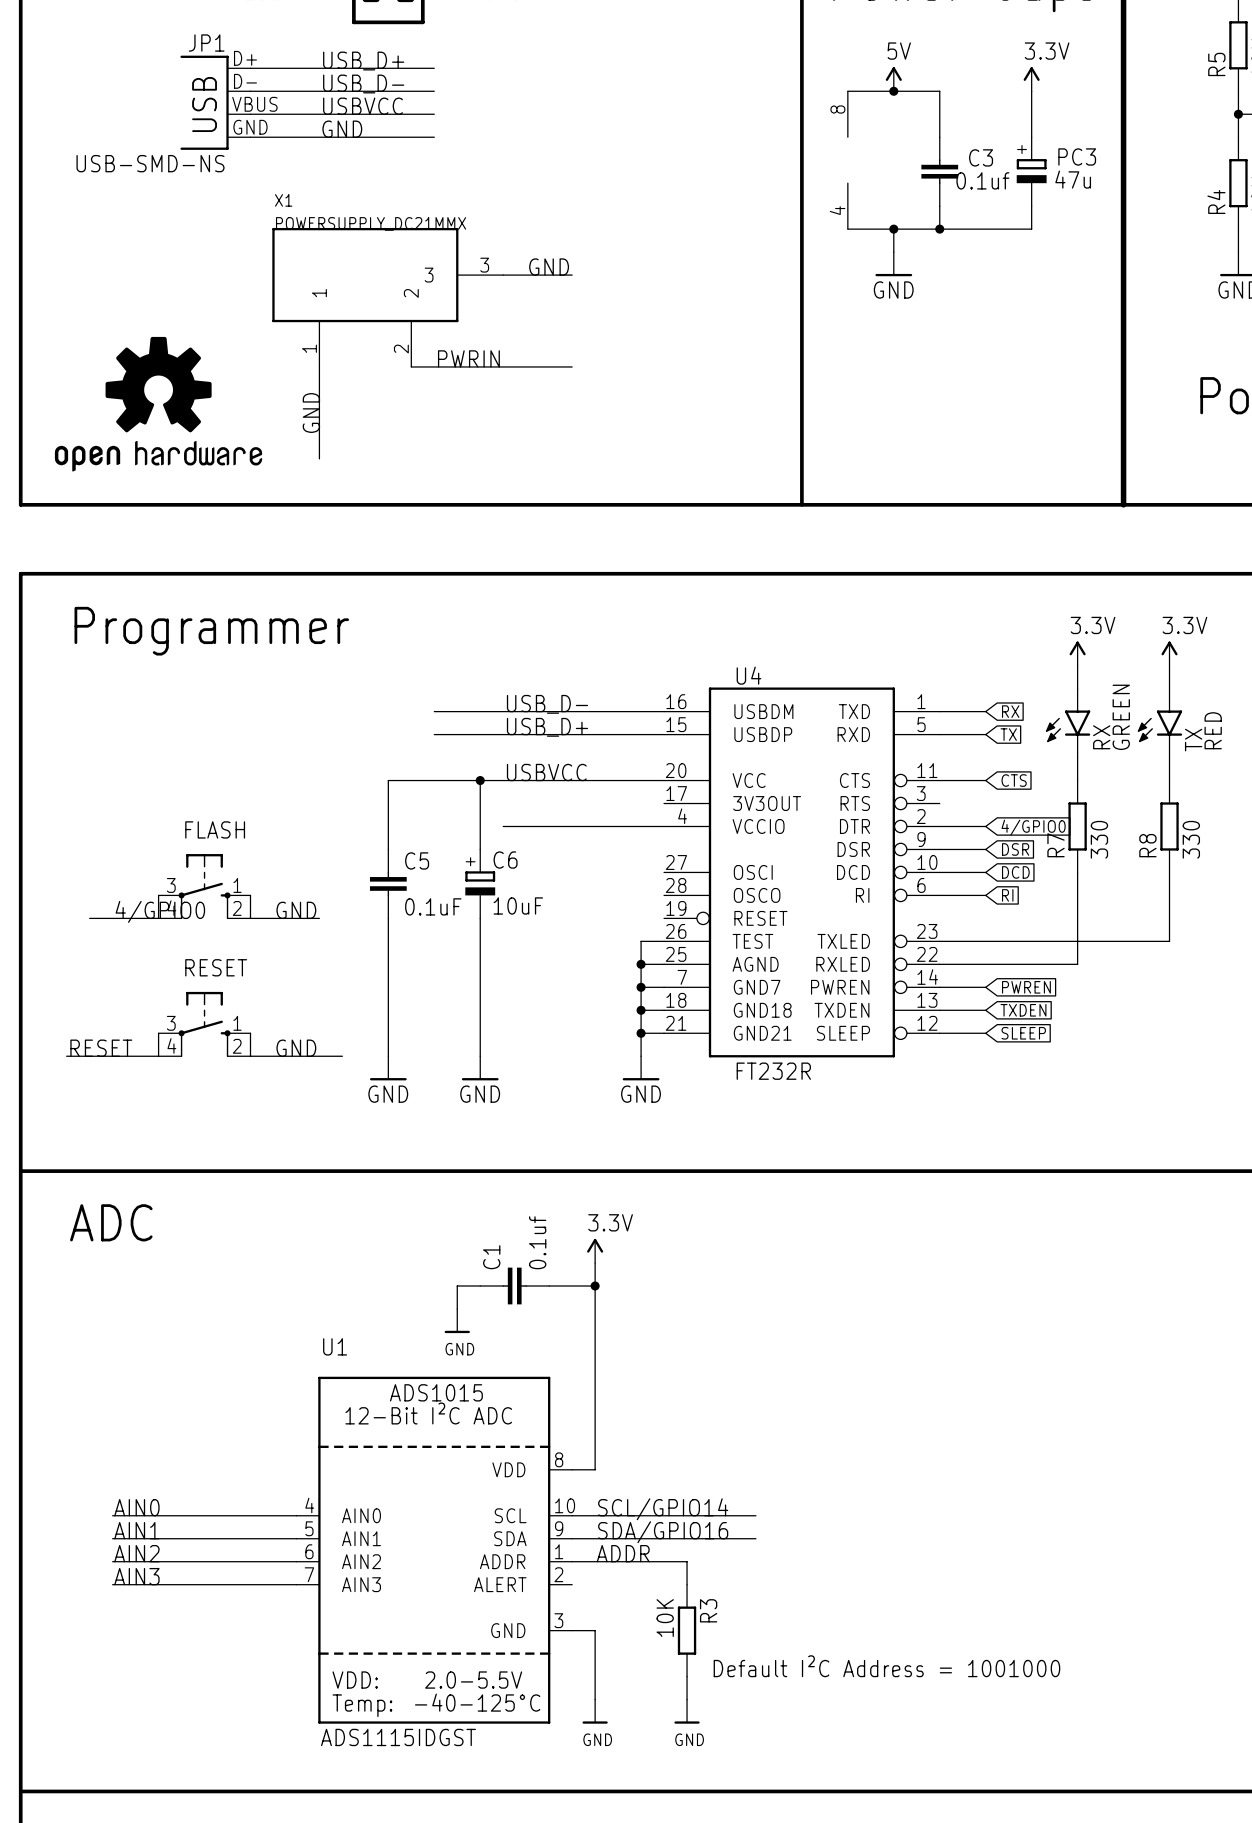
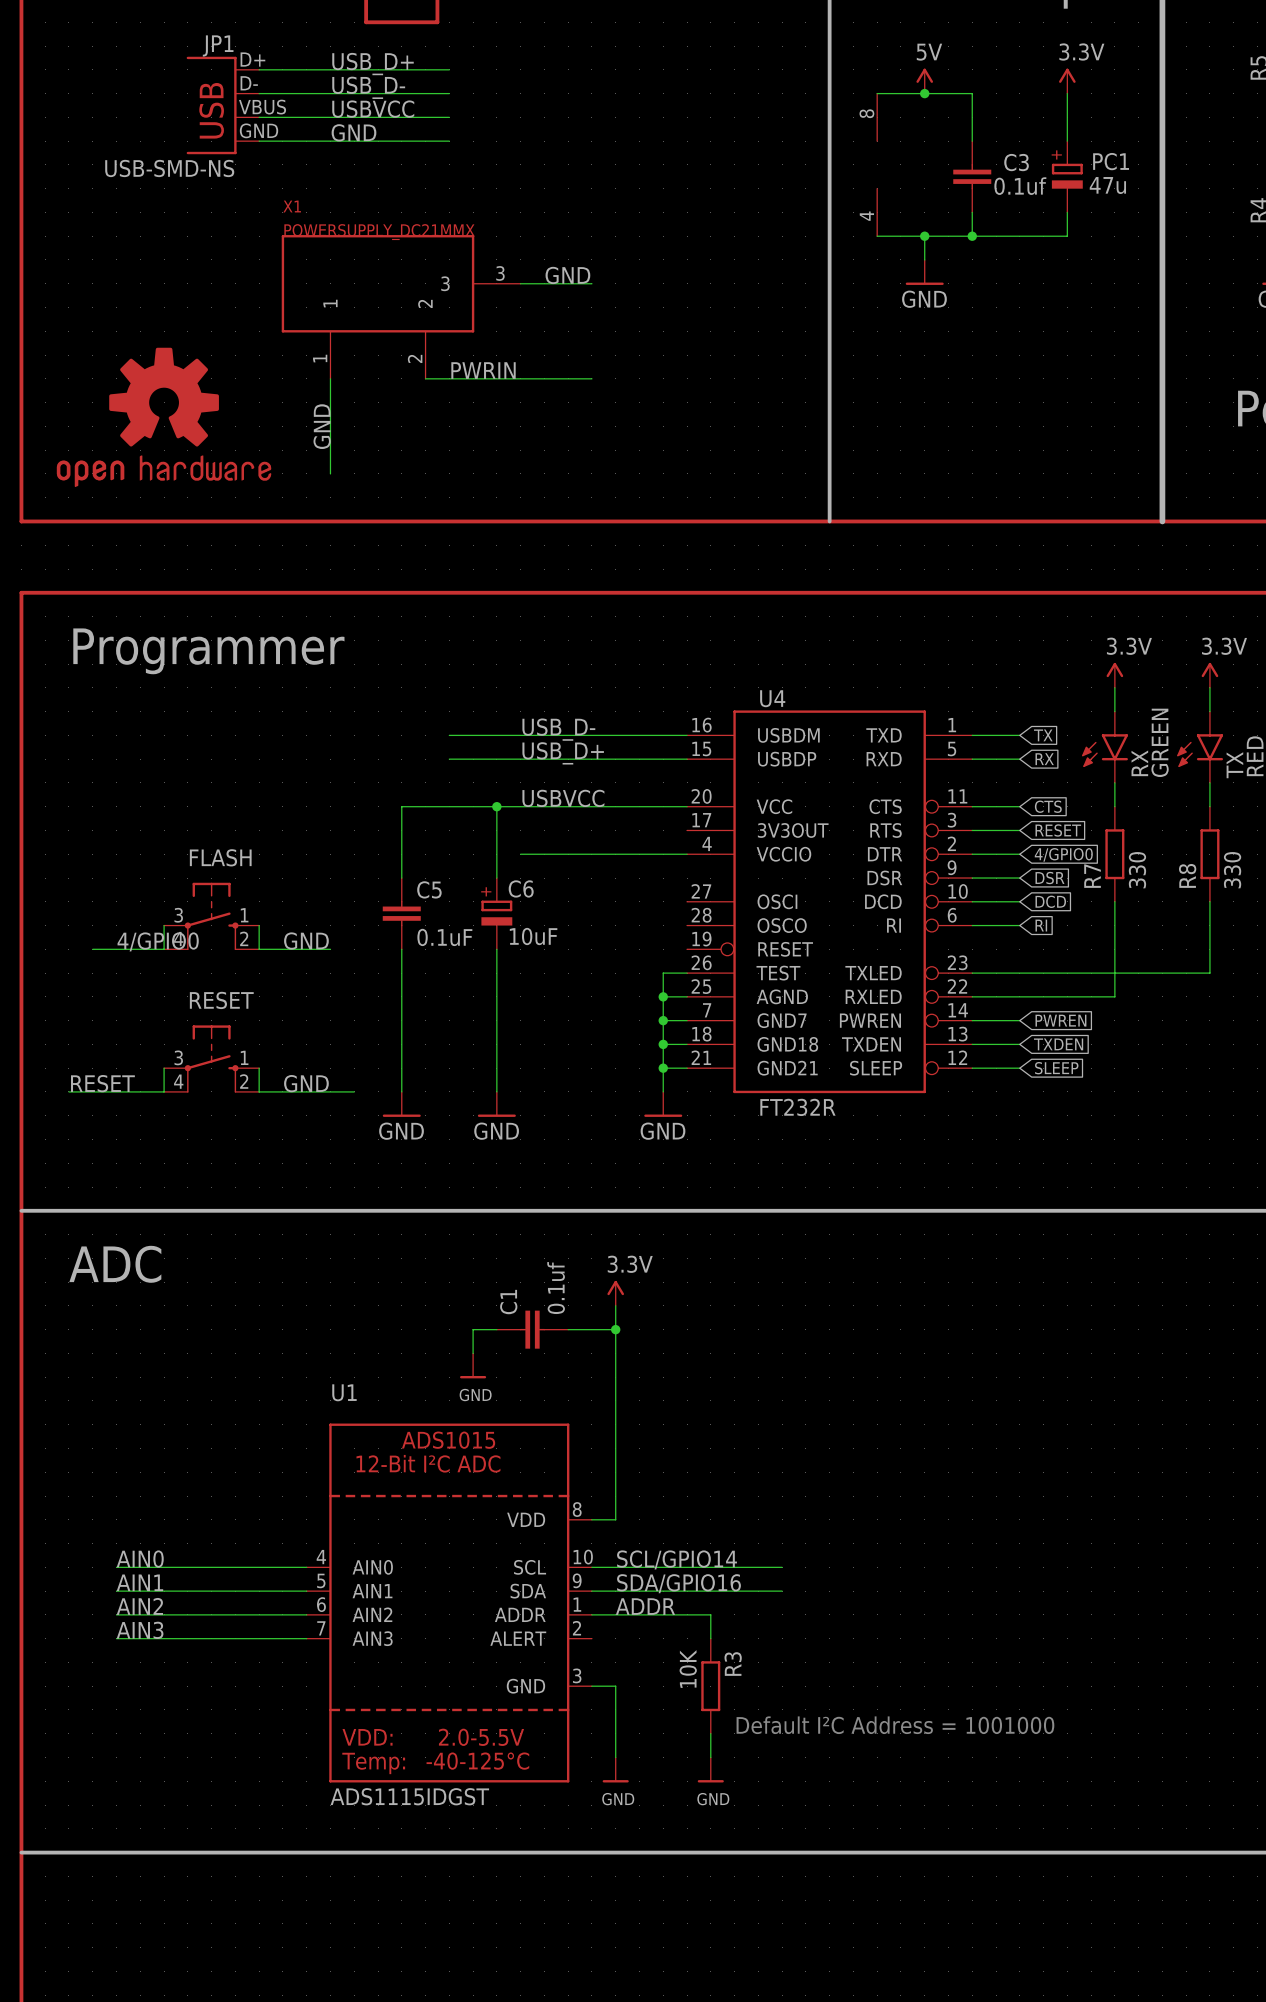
PC3 name: PC3 (1077, 156) -> PC1 (1111, 161)
global label: RX (1010, 711) -> TX (1043, 735)
global label: TX (1008, 734) -> RX (1044, 759)
wire: none -> (972, 830) (1019, 830)
global label: none -> RESET (1058, 830)

